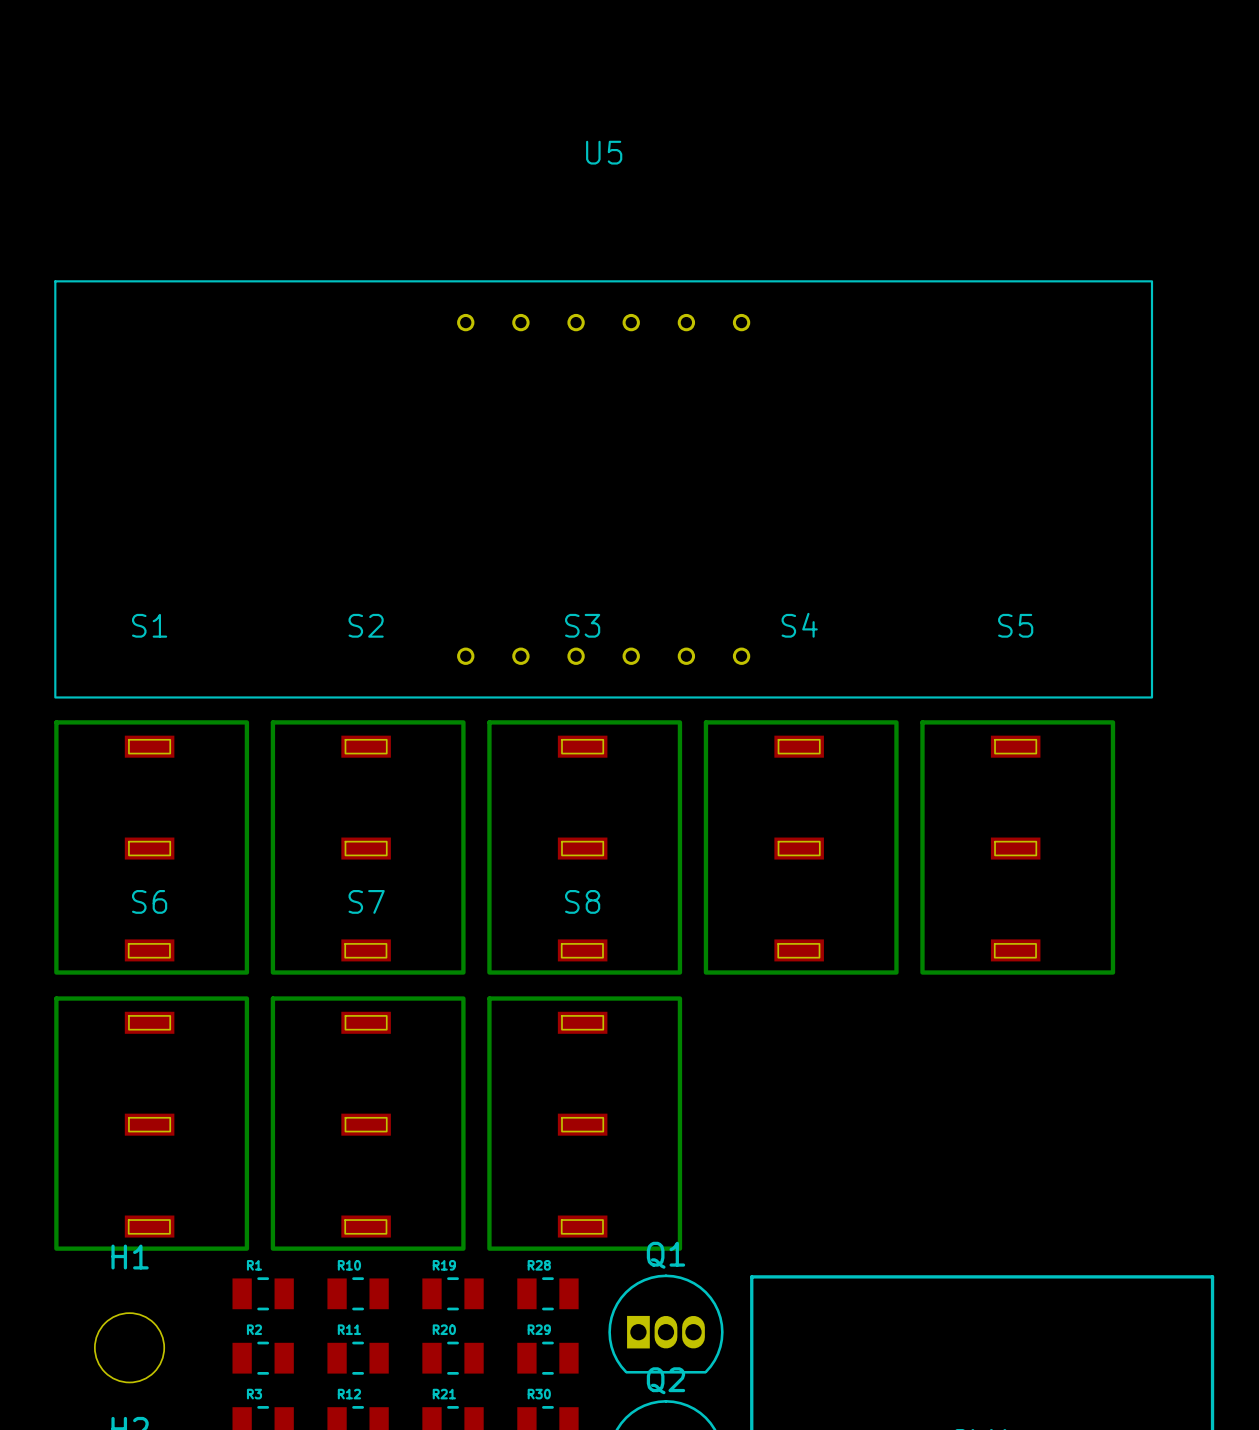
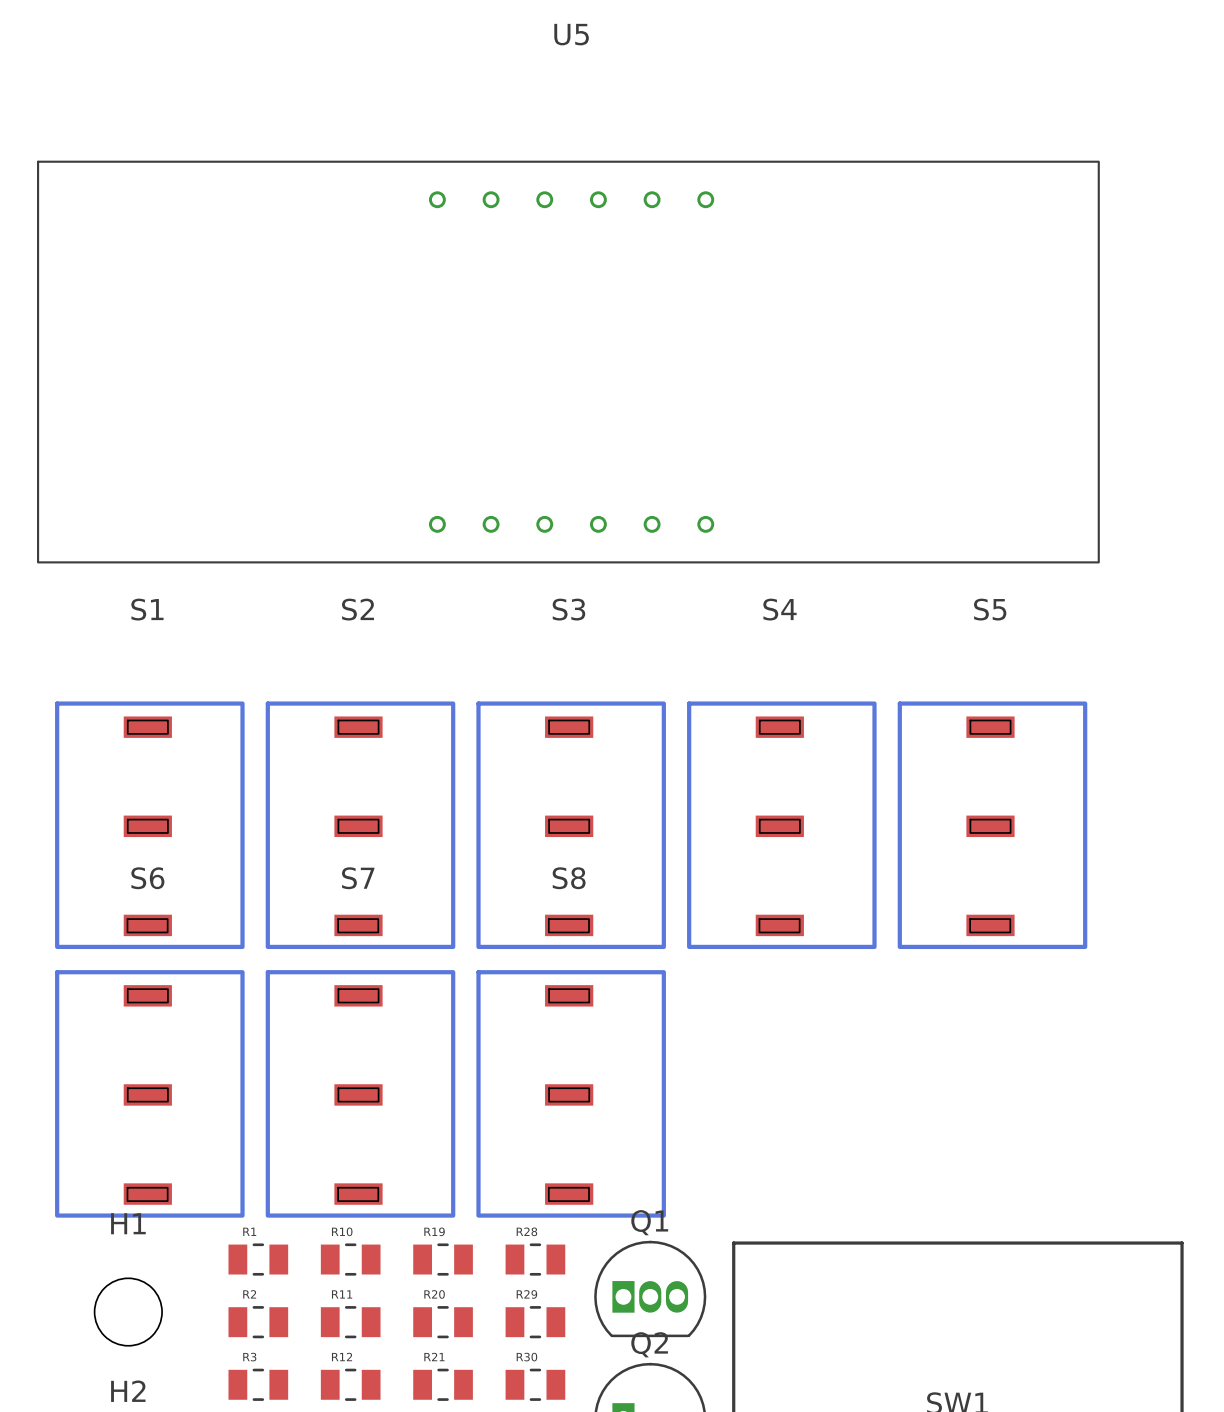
U5 footprint: [54, 280, 1154, 699] -> [37, 160, 1100, 564]

